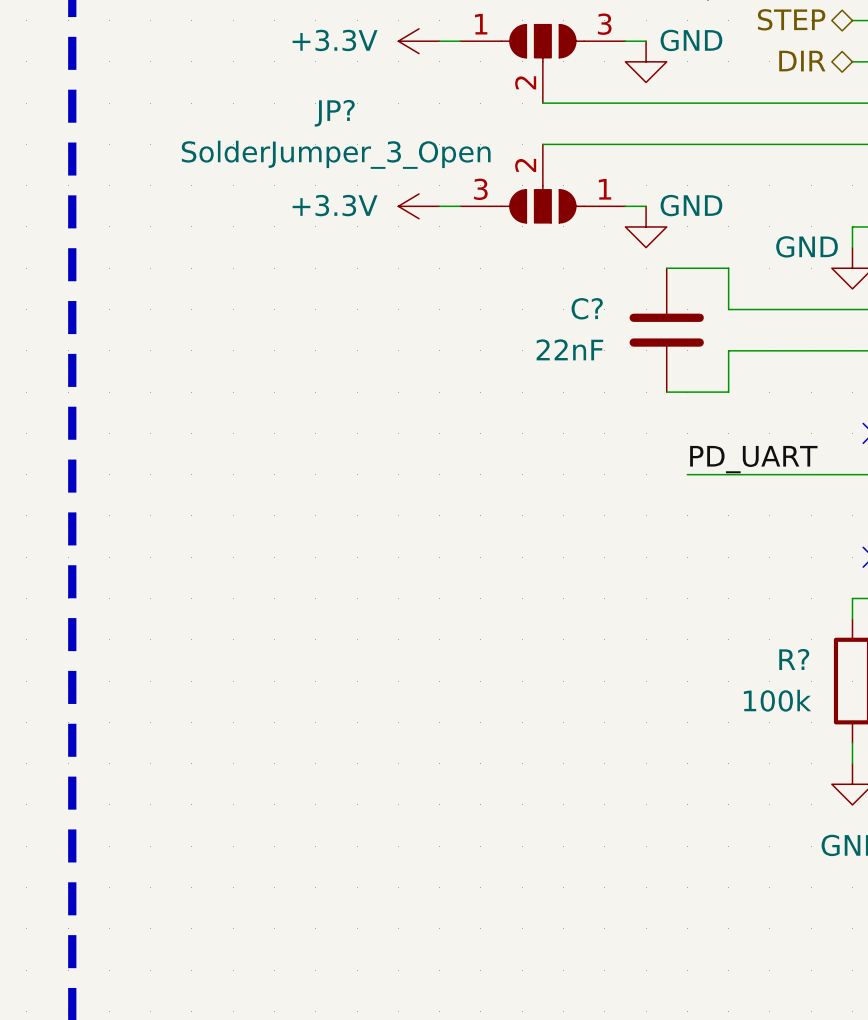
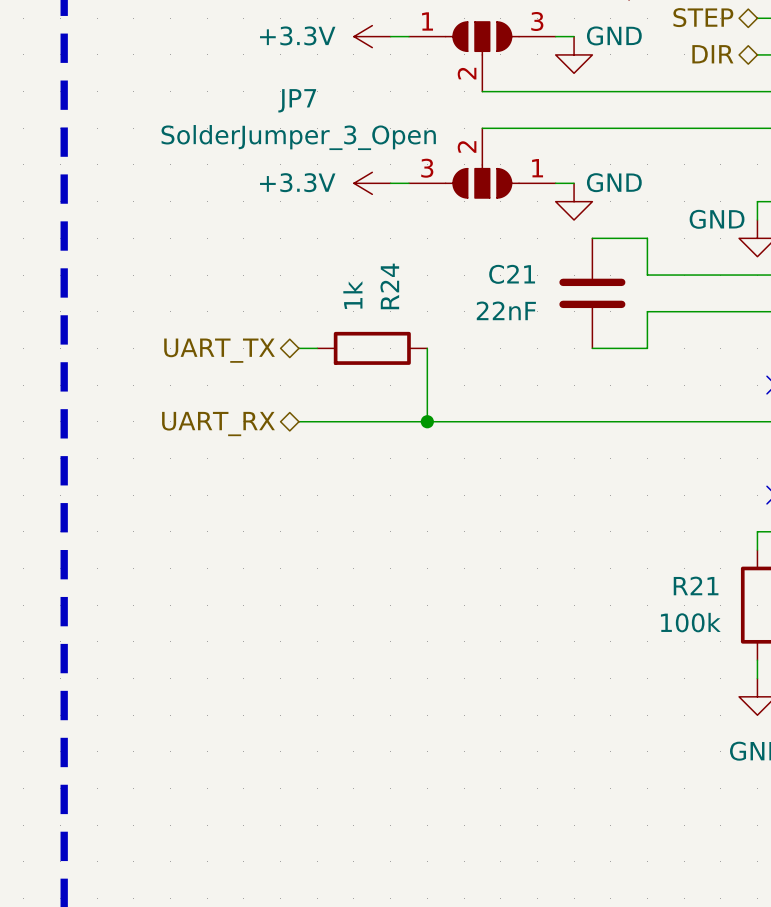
JP? name: JP? (334, 113) -> JP7 (297, 100)
C? name: C? (587, 308) -> C21 (512, 274)
wire: none -> (298, 348) (317, 348)
R24: none -> 1k (372, 348)
wire: none -> (427, 348) (427, 421)
hierarchical label: none -> UART_TX (219, 350)
label: PD_UART (753, 459) -> none
wire: none -> (298, 421) (610, 421)
junction: none -> (427, 421)
hierarchical label: none -> UART_RX (218, 424)
R? name: R? (794, 659) -> R21 (696, 585)

